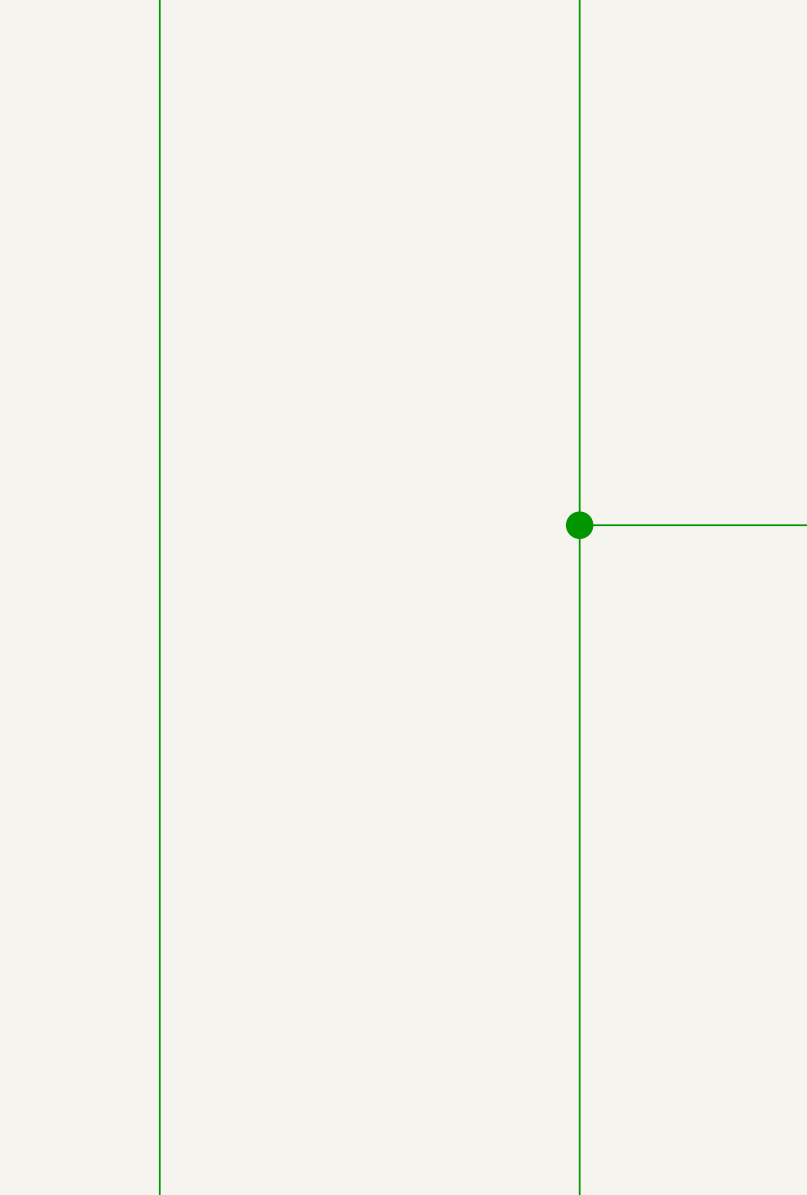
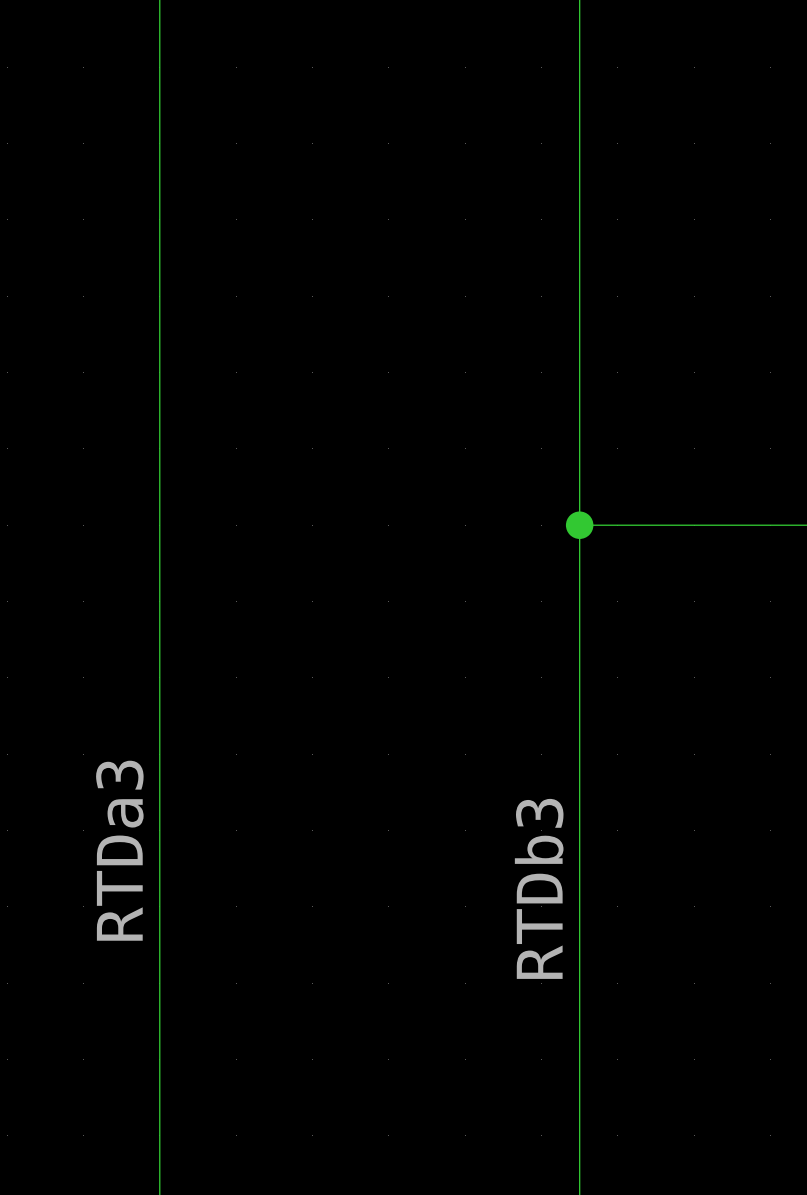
label: none -> RTDa3 (119, 850)
label: none -> RTDb3 (539, 888)

